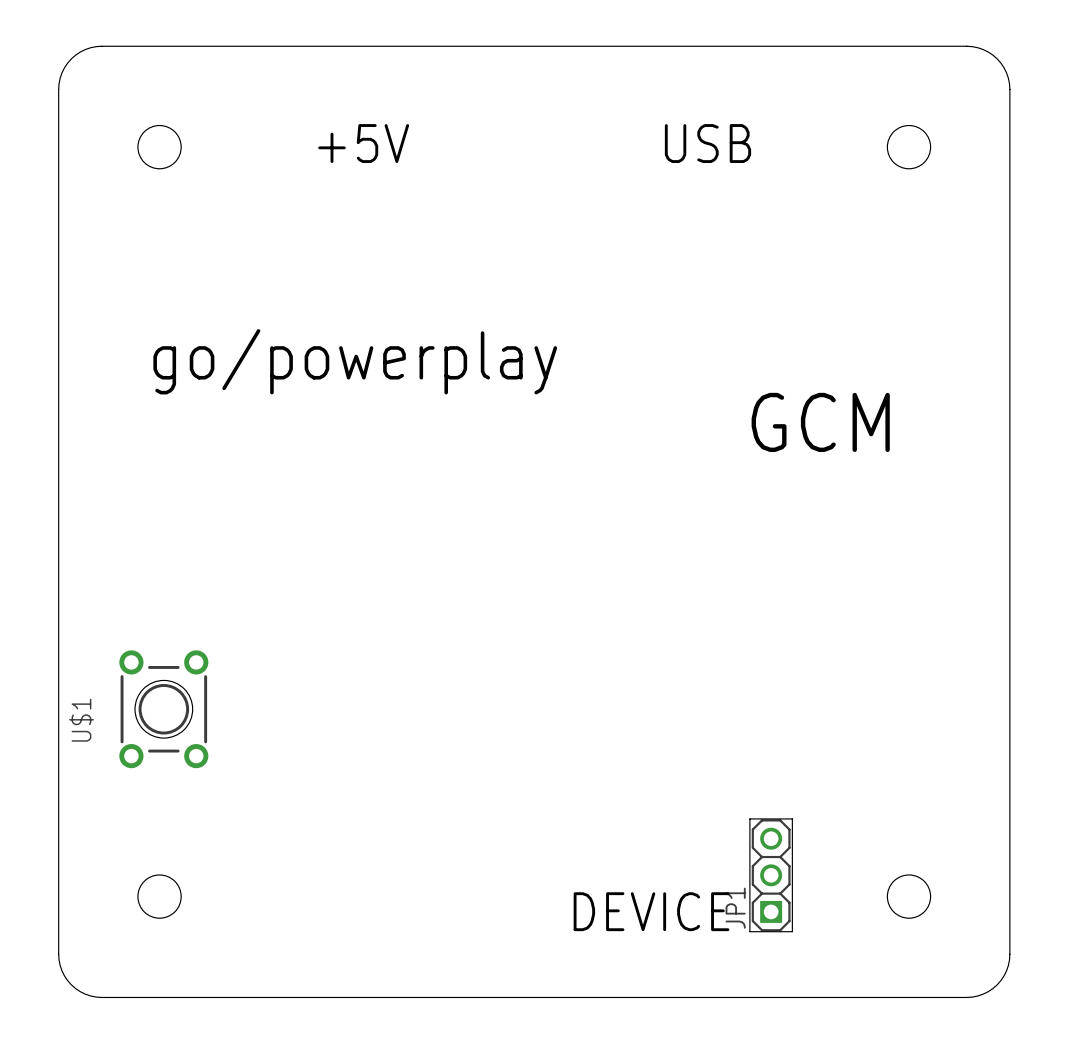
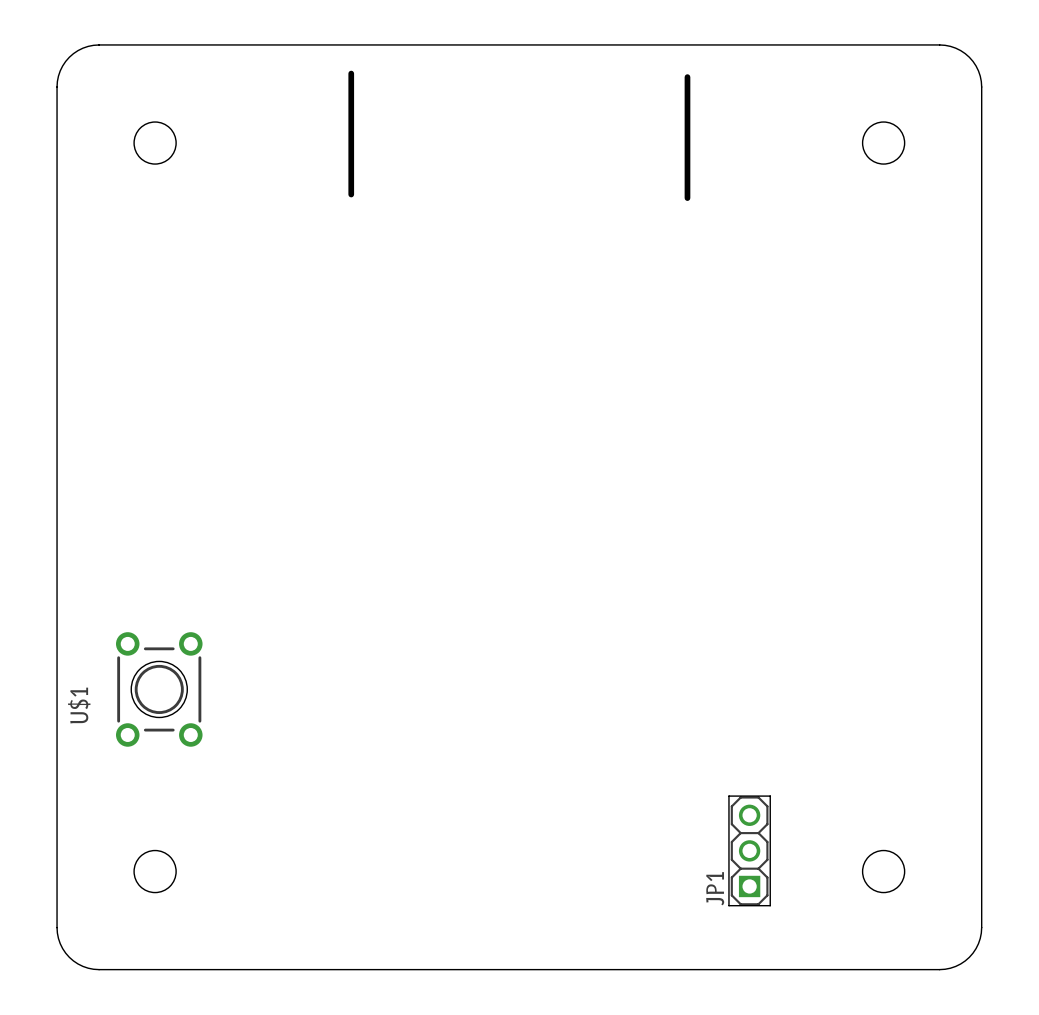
board edge: none -> (351, 73) (351, 194)
board edge: none -> (687, 77) (687, 198)
text: +5V (363, 143) -> none
text: USB (707, 143) -> none
text: go/powerplay (355, 361) -> none
text: GCM (820, 422) -> none
text: DEVICE (651, 911) -> none

